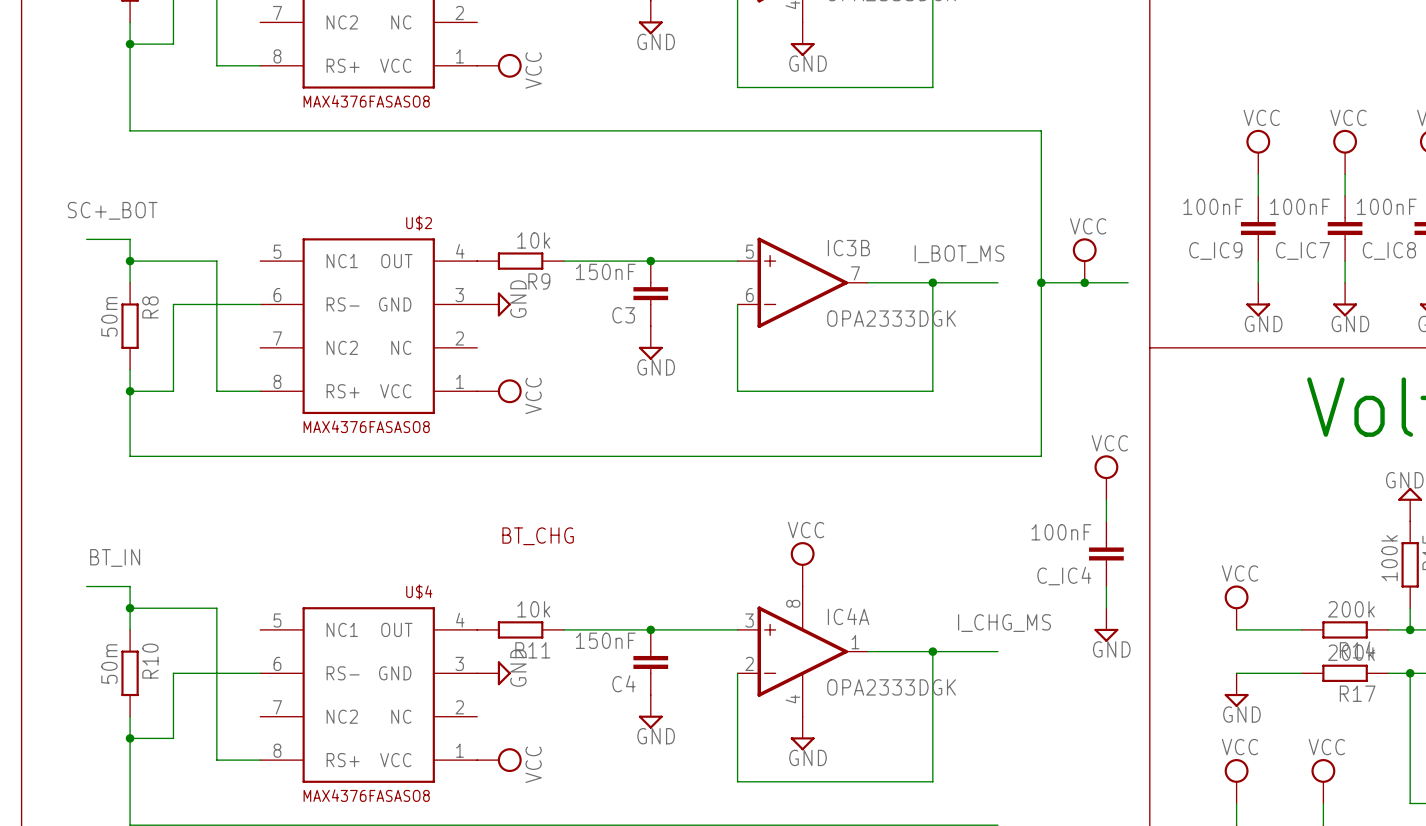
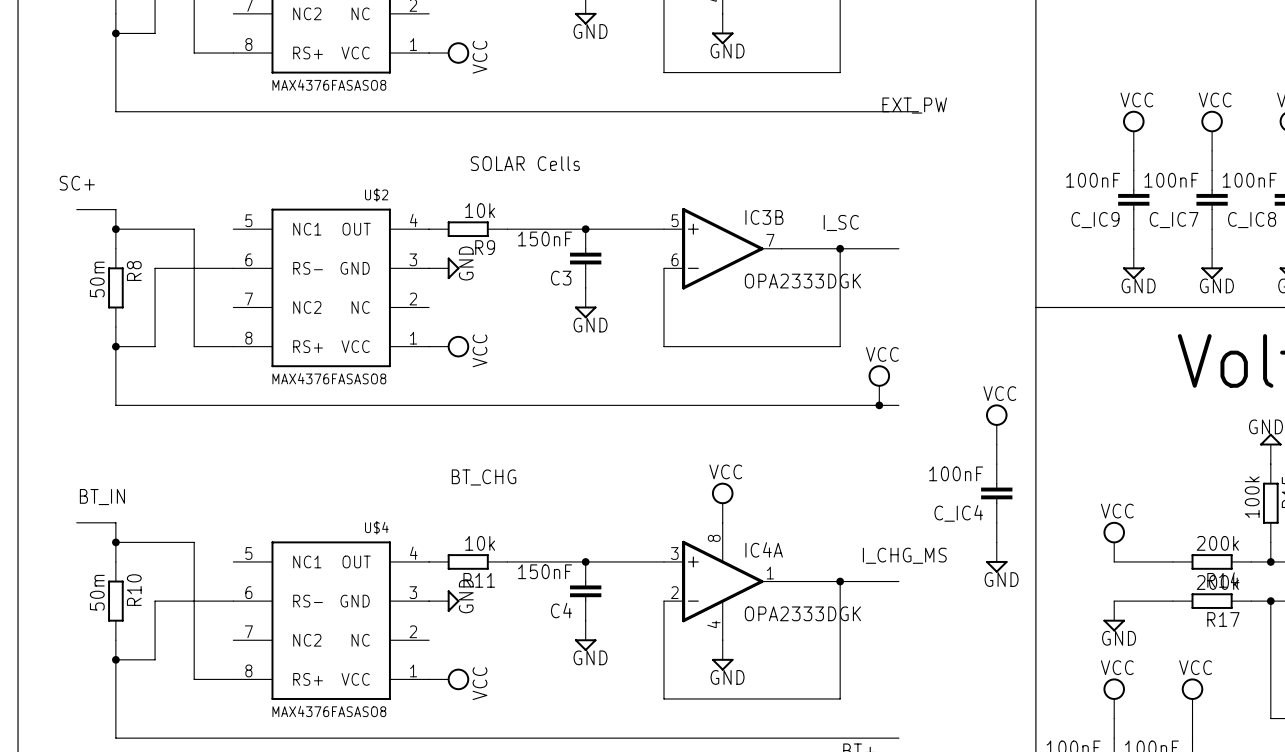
label: none -> EXT_PW (914, 105)
wire: (1019, 130) (1041, 130) (1041, 456) (997, 456) -> none
text: none -> SOLAR Cells (525, 163)
label: SC+_BOT (112, 210) -> SC+ (77, 183)
label: I_BOT_MS (959, 254) -> I_SC (841, 222)
power symbol position: VCC (1084, 260) -> VCC (879, 385)
wire: (1041, 282) (1128, 282) -> none
junction: (1041, 282) -> none
junction: (1084, 282) -> none
junction: none -> (879, 405)

